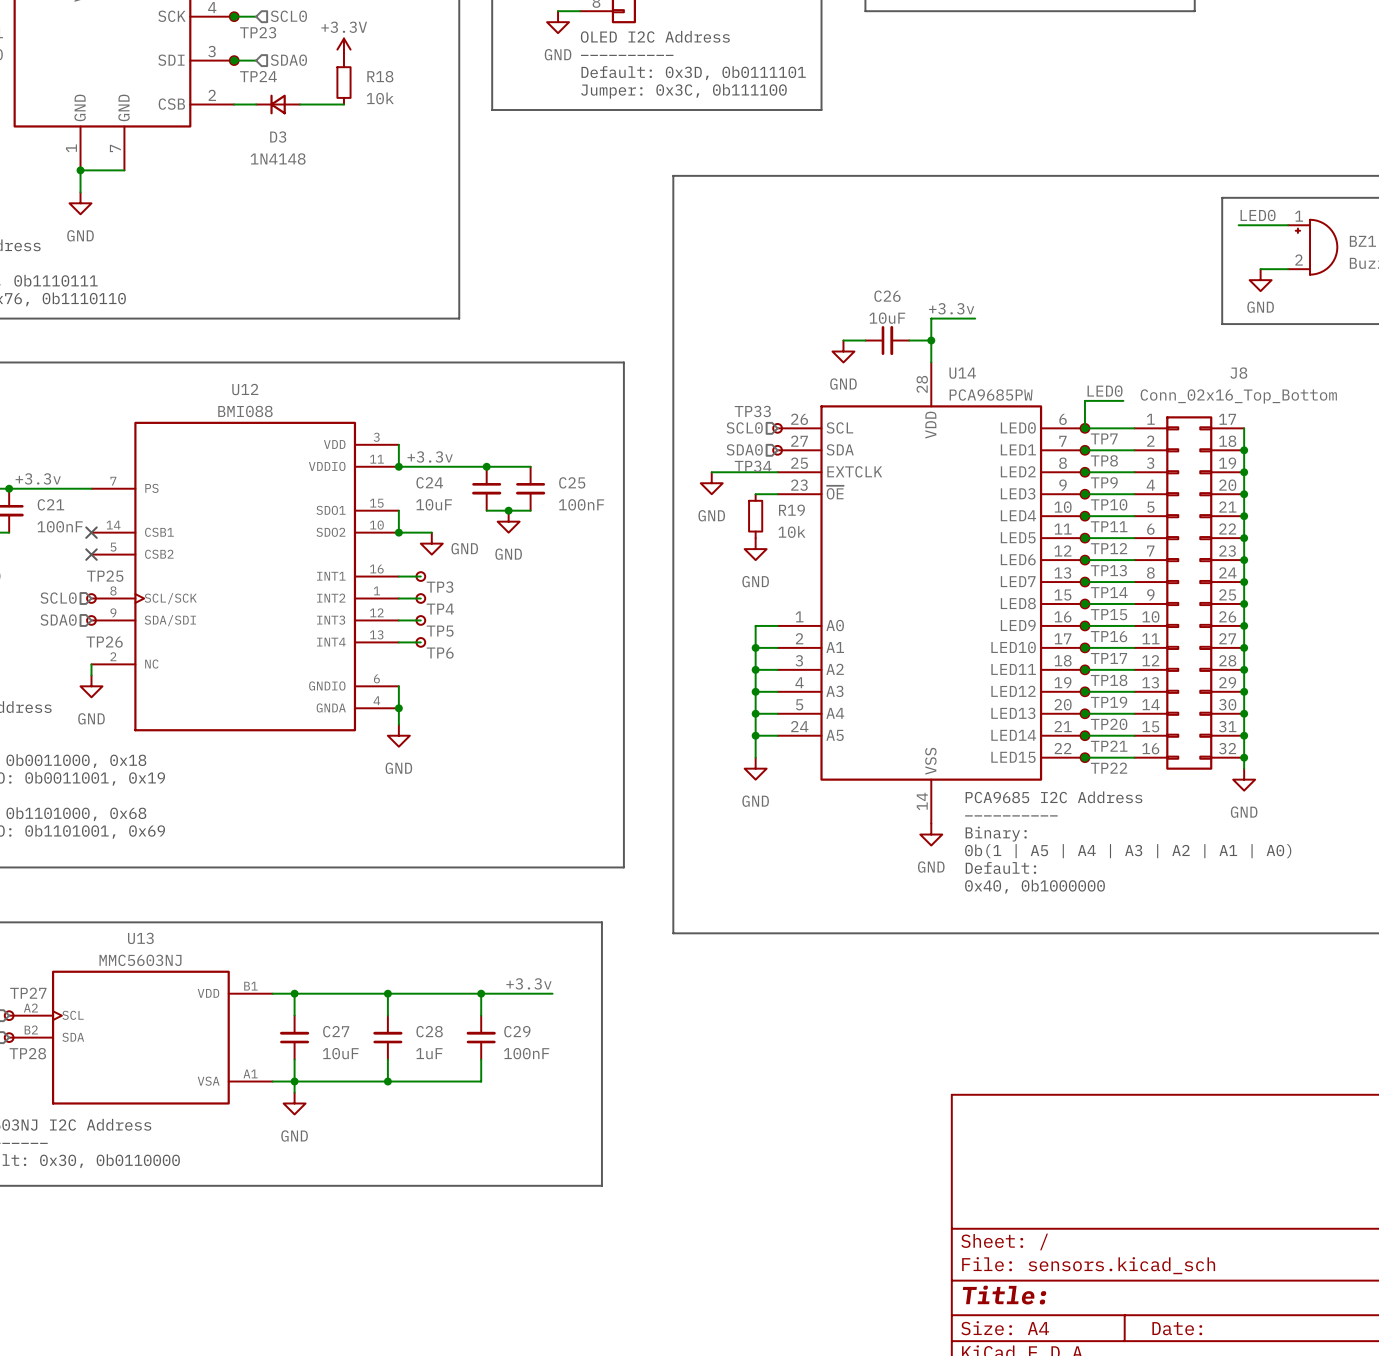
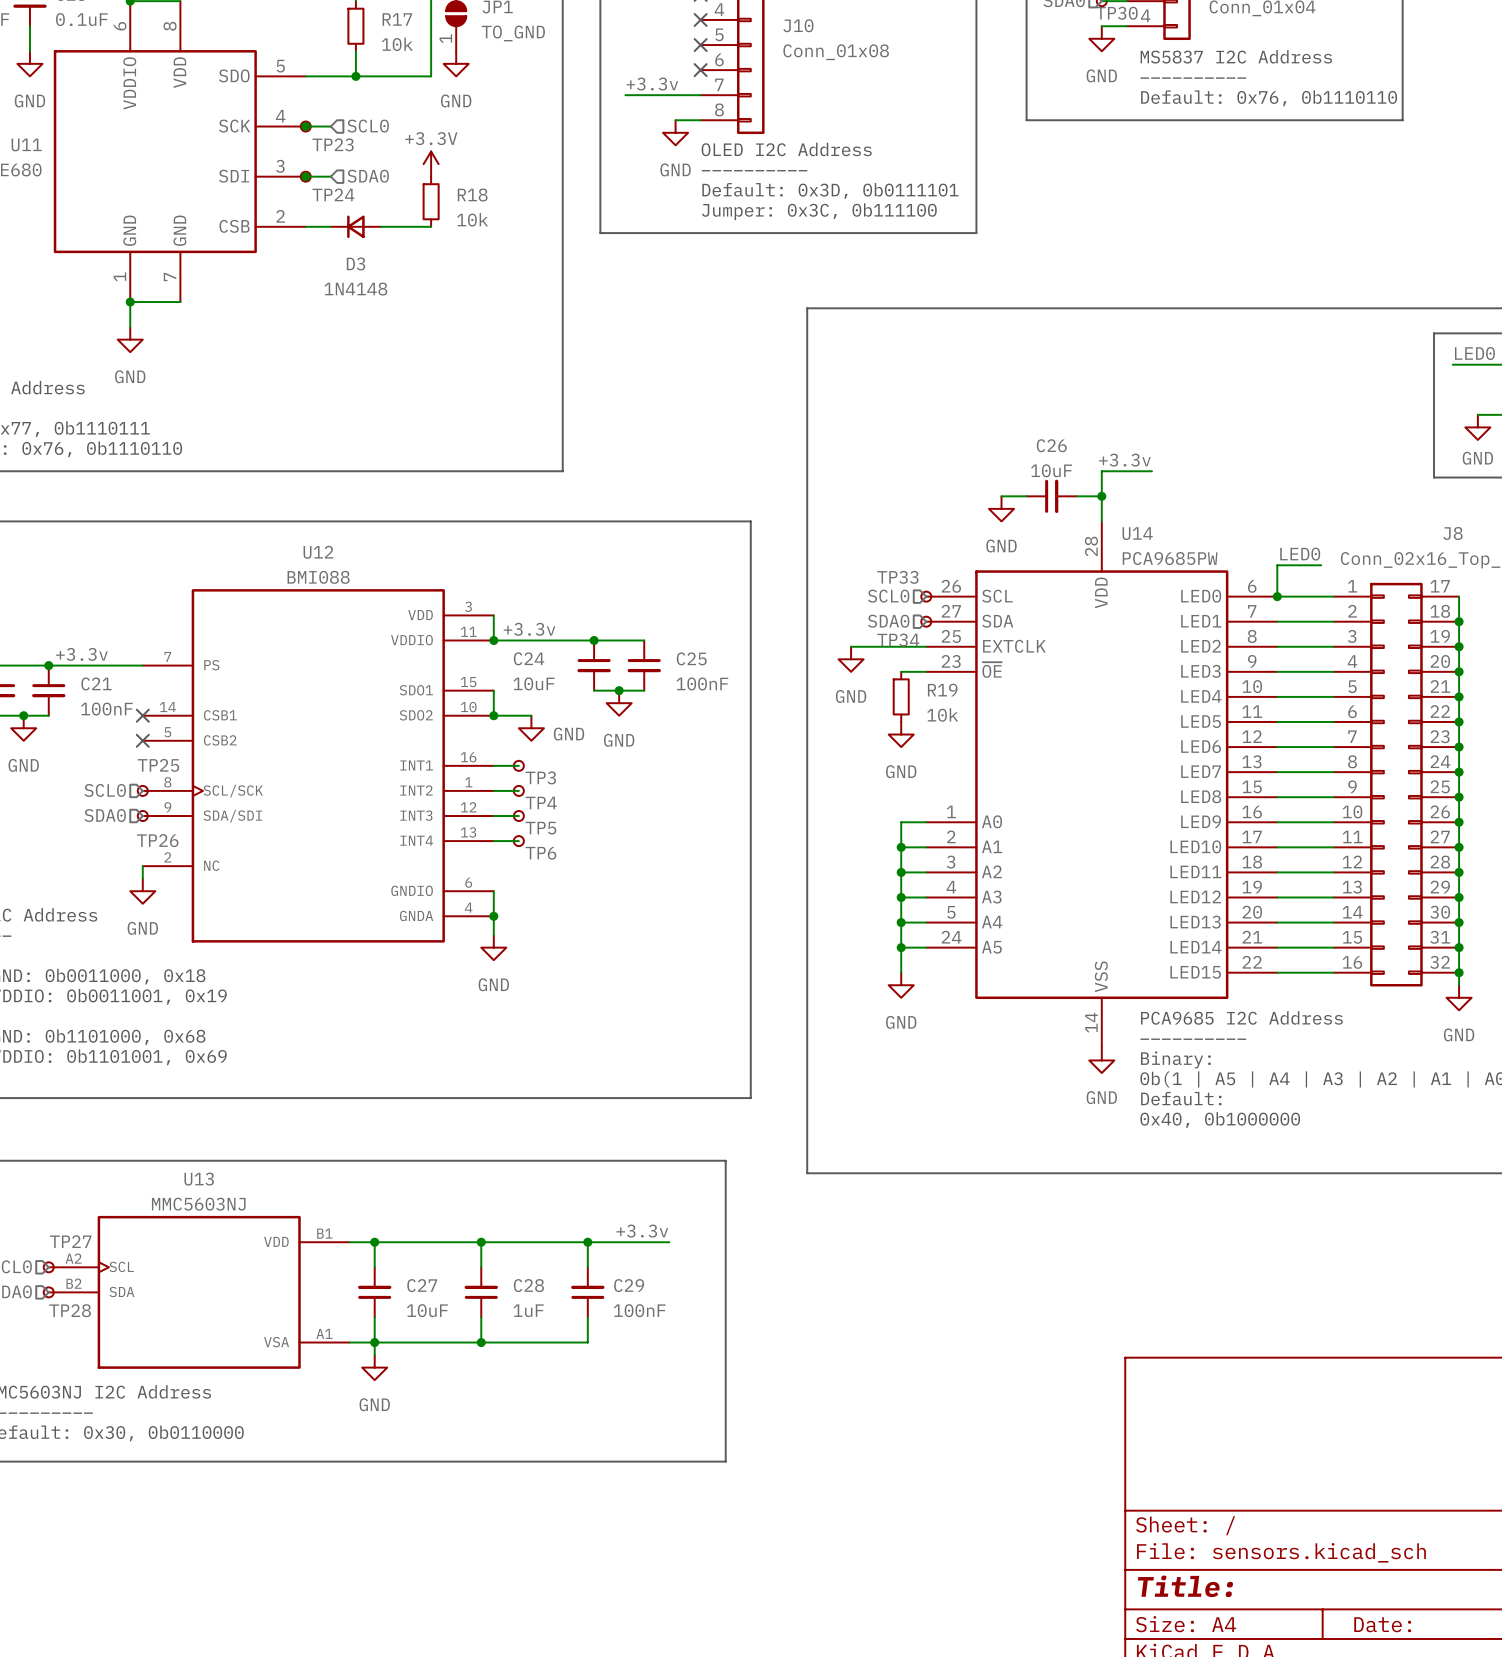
TP7: (1084, 428) -> none
junction: (1084, 450) -> none
TP8: (1084, 450) -> none
junction: (1084, 472) -> none
TP9: (1084, 472) -> none
junction: (1084, 494) -> none
TP10: (1084, 494) -> none
junction: (1084, 516) -> none
TP11: (1084, 516) -> none
junction: (1084, 538) -> none
TP12: (1084, 538) -> none
junction: (1084, 560) -> none
TP13: (1084, 560) -> none
junction: (1084, 582) -> none
TP14: (1084, 582) -> none
junction: (1084, 603) -> none
TP15: (1084, 603) -> none
junction: (1084, 625) -> none
TP16: (1084, 625) -> none
junction: (1084, 647) -> none
TP17: (1084, 647) -> none
junction: (1084, 669) -> none
TP18: (1084, 669) -> none
junction: (1084, 691) -> none
TP19: (1084, 691) -> none
junction: (1084, 713) -> none
TP20: (1084, 713) -> none
junction: (1084, 735) -> none
TP21: (1084, 735) -> none
junction: (1084, 757) -> none
TP22: (1084, 757) -> none

